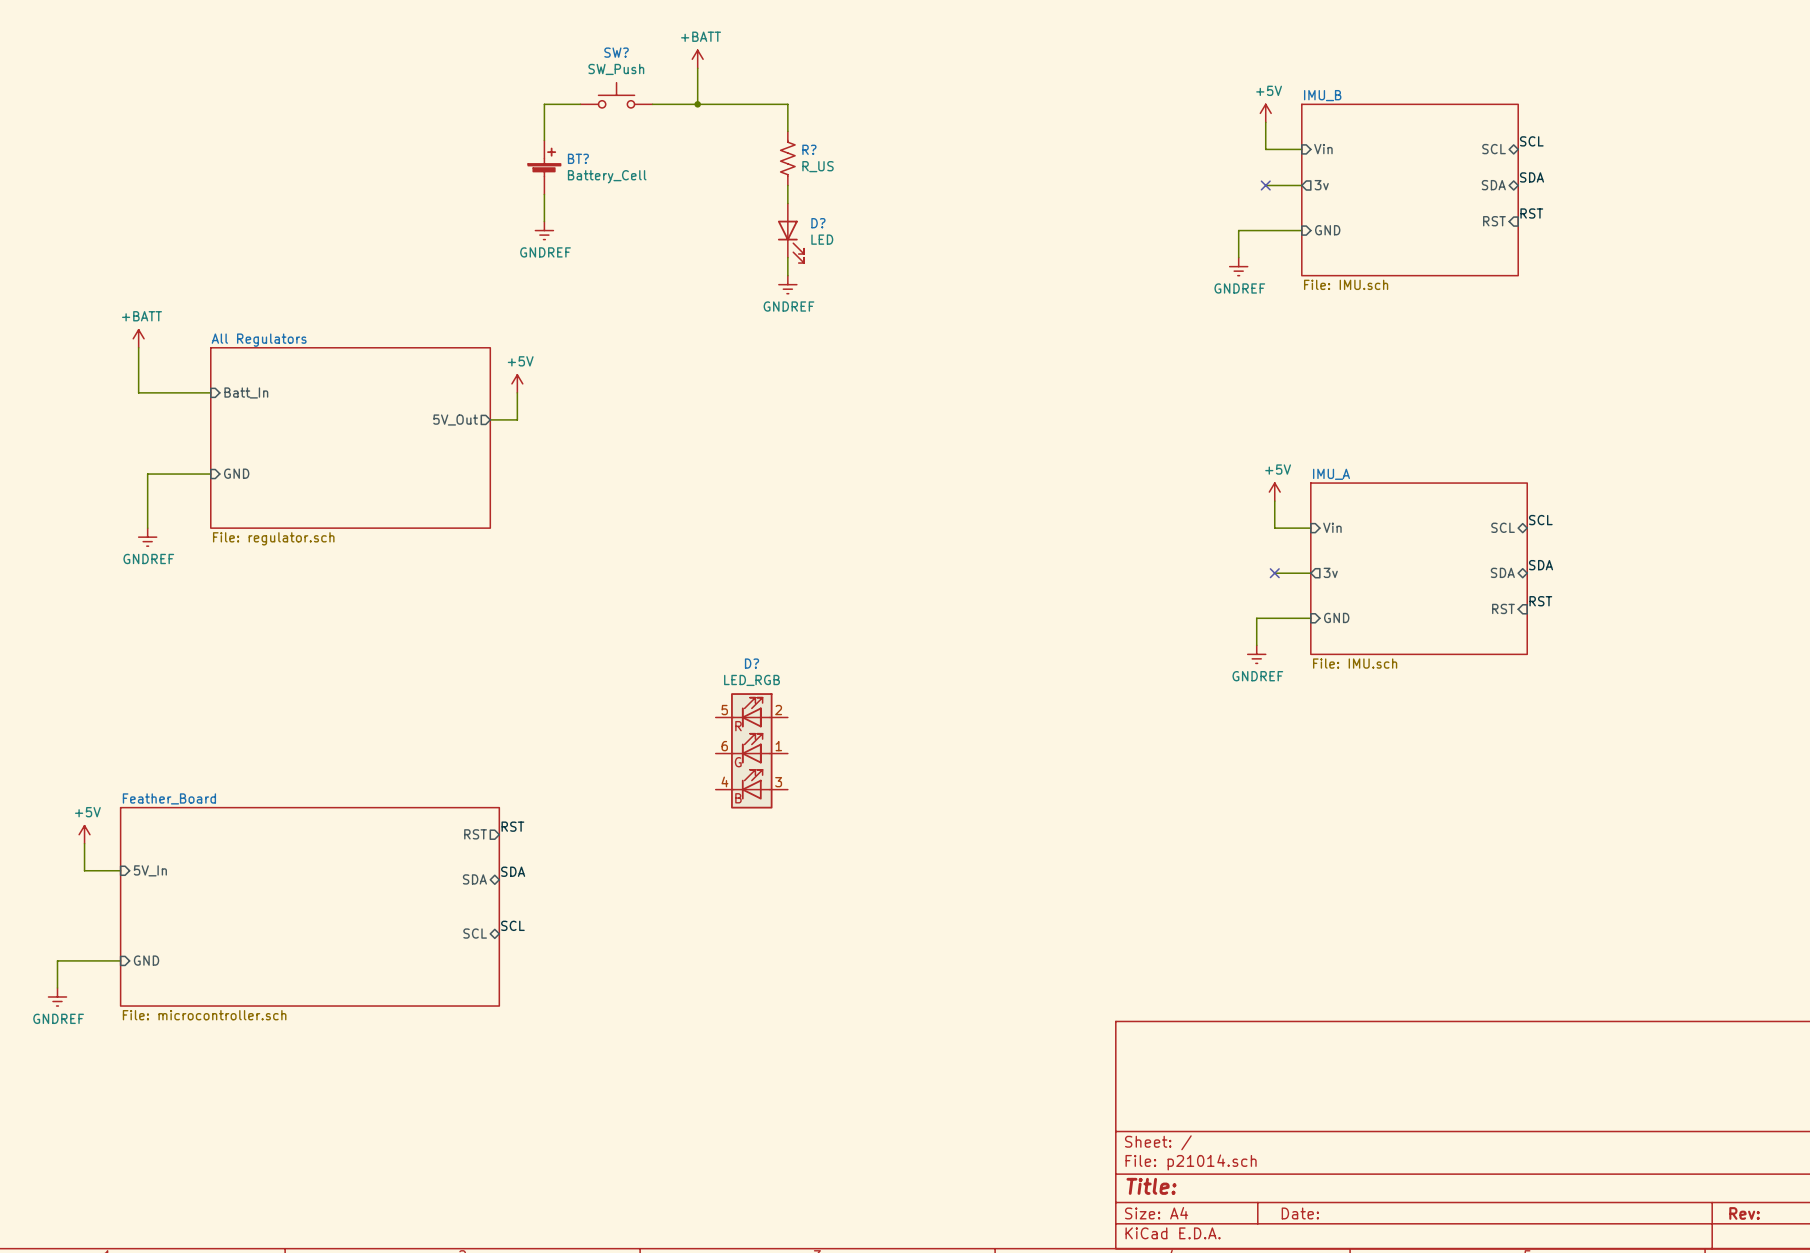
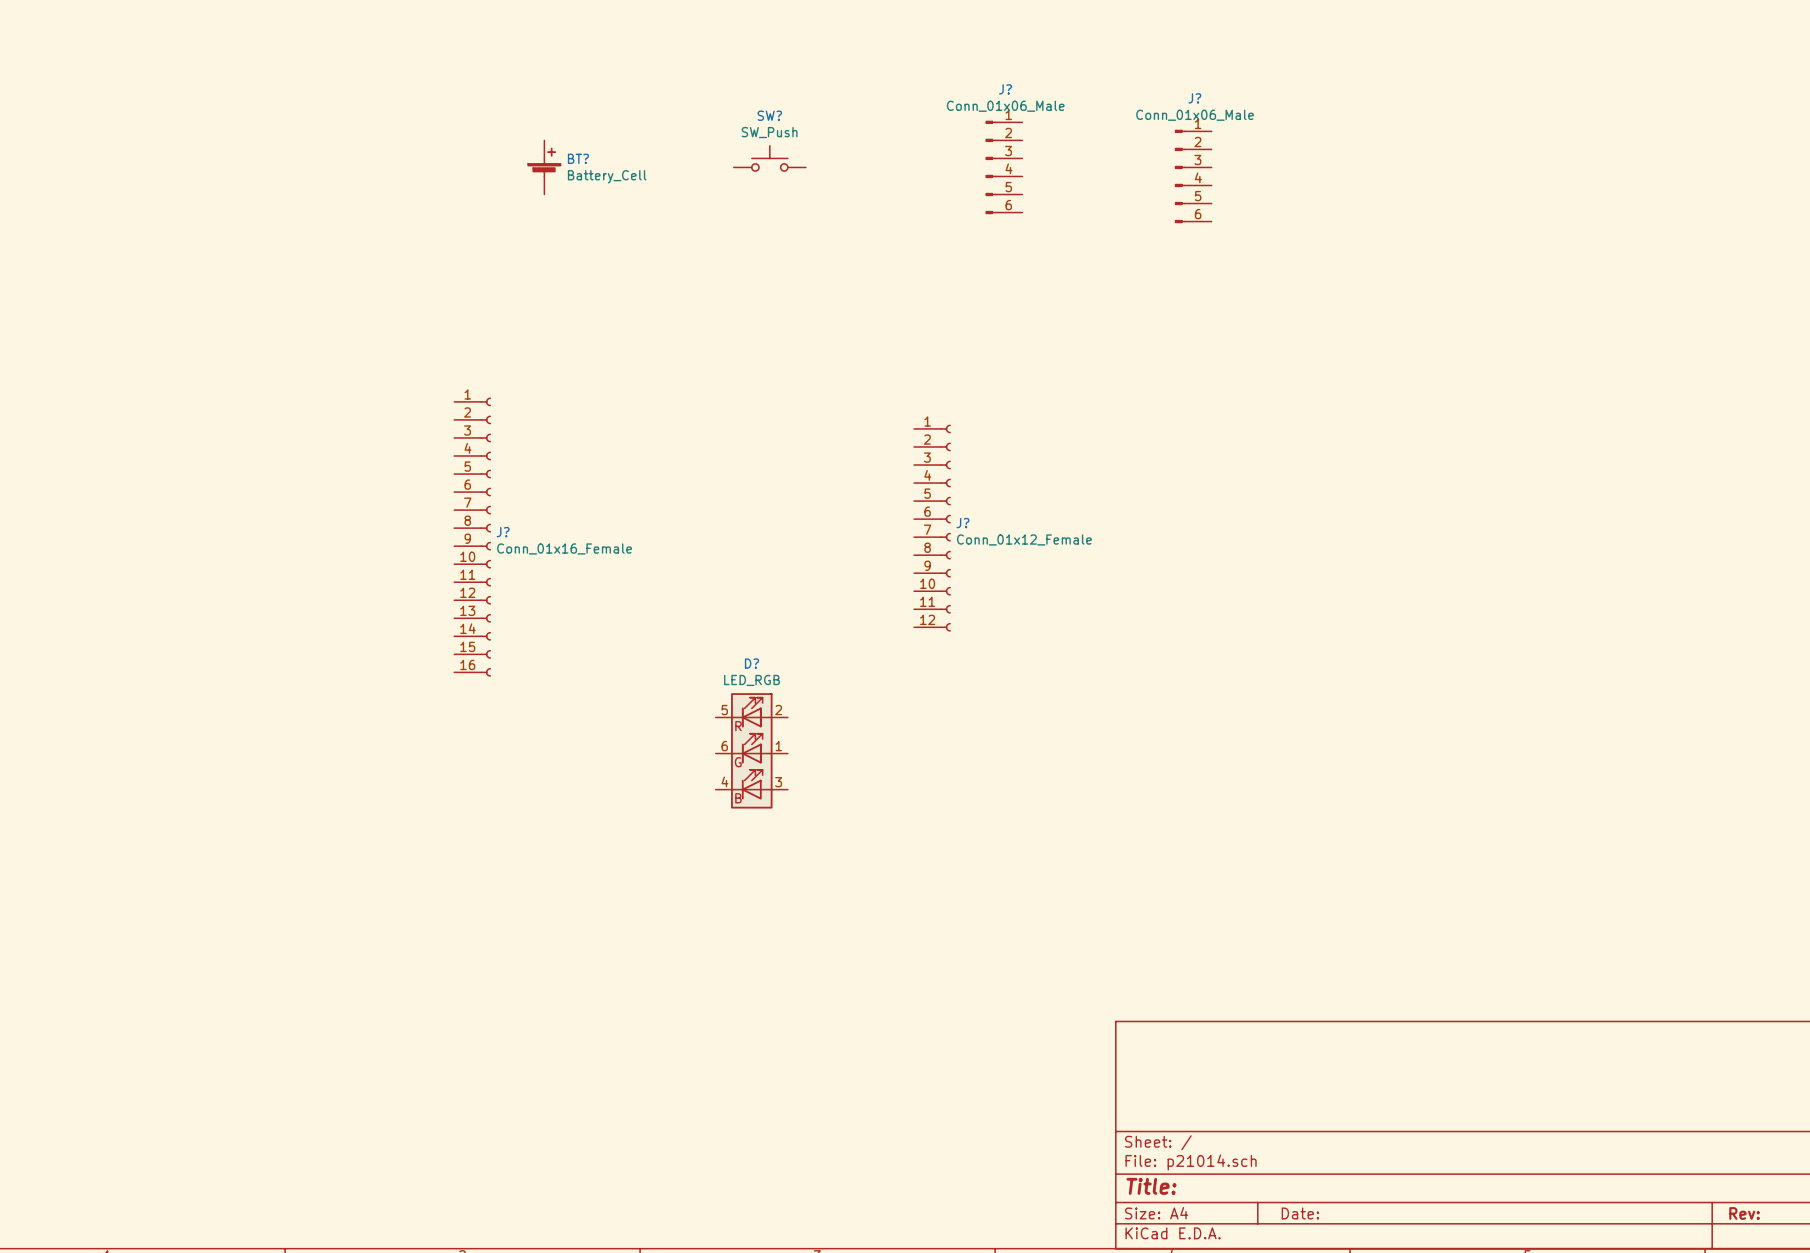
power symbol: +BATT (697, 59) -> none
wire: (697, 68) (697, 104) -> none
SW? position: (616, 95) -> (769, 158)
wire: (580, 104) (544, 104) (544, 140) -> none
wire: (652, 104) (787, 104) (787, 131) -> none
junction: (697, 104) -> none
power symbol: +5V (1265, 113) -> none
wire: (1265, 122) (1265, 149) (1301, 149) -> none
label: SCL (1531, 141) -> none
sheet pin: Vin (1323, 149) -> none
sheet pin: SCL (1494, 149) -> none
R?: R_US (787, 158) -> none
J?: none -> Conn_01x06_Male (1003, 167)
J?: none -> Conn_01x06_Male (1193, 176)
label: SDA (1532, 177) -> none
wire: (787, 185) (787, 203) -> none
wire: (1265, 185) (1301, 185) -> none
no-connect mark: (1265, 185) -> none
sheet pin: 3v (1321, 185) -> none
sheet pin: SDA (1493, 185) -> none
sheet IMU_B: File: IMU.sch (1410, 190) -> none
wire: (544, 194) (544, 221) -> none
label: RST (1531, 213) -> none
sheet pin: RST (1494, 221) -> none
power symbol: GNDREF (544, 230) -> none
wire: (1301, 230) (1238, 230) (1238, 257) -> none
sheet pin: GND (1327, 230) -> none
D?: LED (791, 233) -> none
wire: (787, 257) (787, 275) -> none
power symbol: GNDREF (1238, 266) -> none
power symbol: GNDREF (787, 284) -> none
power symbol: +BATT (138, 338) -> none
wire: (138, 347) (138, 392) (210, 392) -> none
power symbol: +5V (517, 383) -> none
sheet pin: Batt_In (246, 392) -> none
wire: (517, 392) (517, 419) (490, 419) -> none
sheet pin: 5V_Out (455, 420) -> none
sheet All Regulators: File: regulator.sch (350, 437) -> none
sheet pin: GND (236, 473) -> none
wire: (210, 474) (147, 474) (147, 528) -> none
power symbol: +5V (1274, 492) -> none
wire: (1274, 501) (1274, 528) (1310, 528) -> none
label: SCL (1540, 520) -> none
sheet pin: Vin (1332, 527) -> none
sheet pin: SCL (1503, 527) -> none
J?: none -> Conn_01x12_Female (932, 528)
power symbol: GNDREF (147, 537) -> none
J?: none -> Conn_01x16_Female (472, 537)
label: SDA (1541, 565) -> none
sheet IMU_A: File: IMU.sch (1419, 568) -> none
sheet pin: 3v (1330, 572) -> none
sheet pin: SDA (1502, 572) -> none
wire: (1274, 573) (1310, 573) -> none
no-connect mark: (1274, 573) -> none
label: RST (1540, 601) -> none
sheet pin: RST (1503, 608) -> none
sheet pin: GND (1336, 617) -> none
wire: (1310, 618) (1256, 618) (1256, 645) -> none
power symbol: GNDREF (1256, 654) -> none
label: RST (512, 826) -> none
power symbol: +5V (84, 834) -> none
sheet pin: RST (475, 834) -> none
wire: (84, 843) (84, 870) (120, 870) -> none
sheet pin: 5V_In (150, 870) -> none
label: SDA (513, 871) -> none
sheet pin: SDA (474, 879) -> none
sheet Feather_Board: File: microcontroller.sch (309, 906) -> none
label: SCL (512, 925) -> none
sheet pin: SCL (475, 933) -> none
wire: (120, 960) (57, 960) (57, 987) -> none
sheet pin: GND (146, 960) -> none
power symbol: GNDREF (57, 996) -> none

